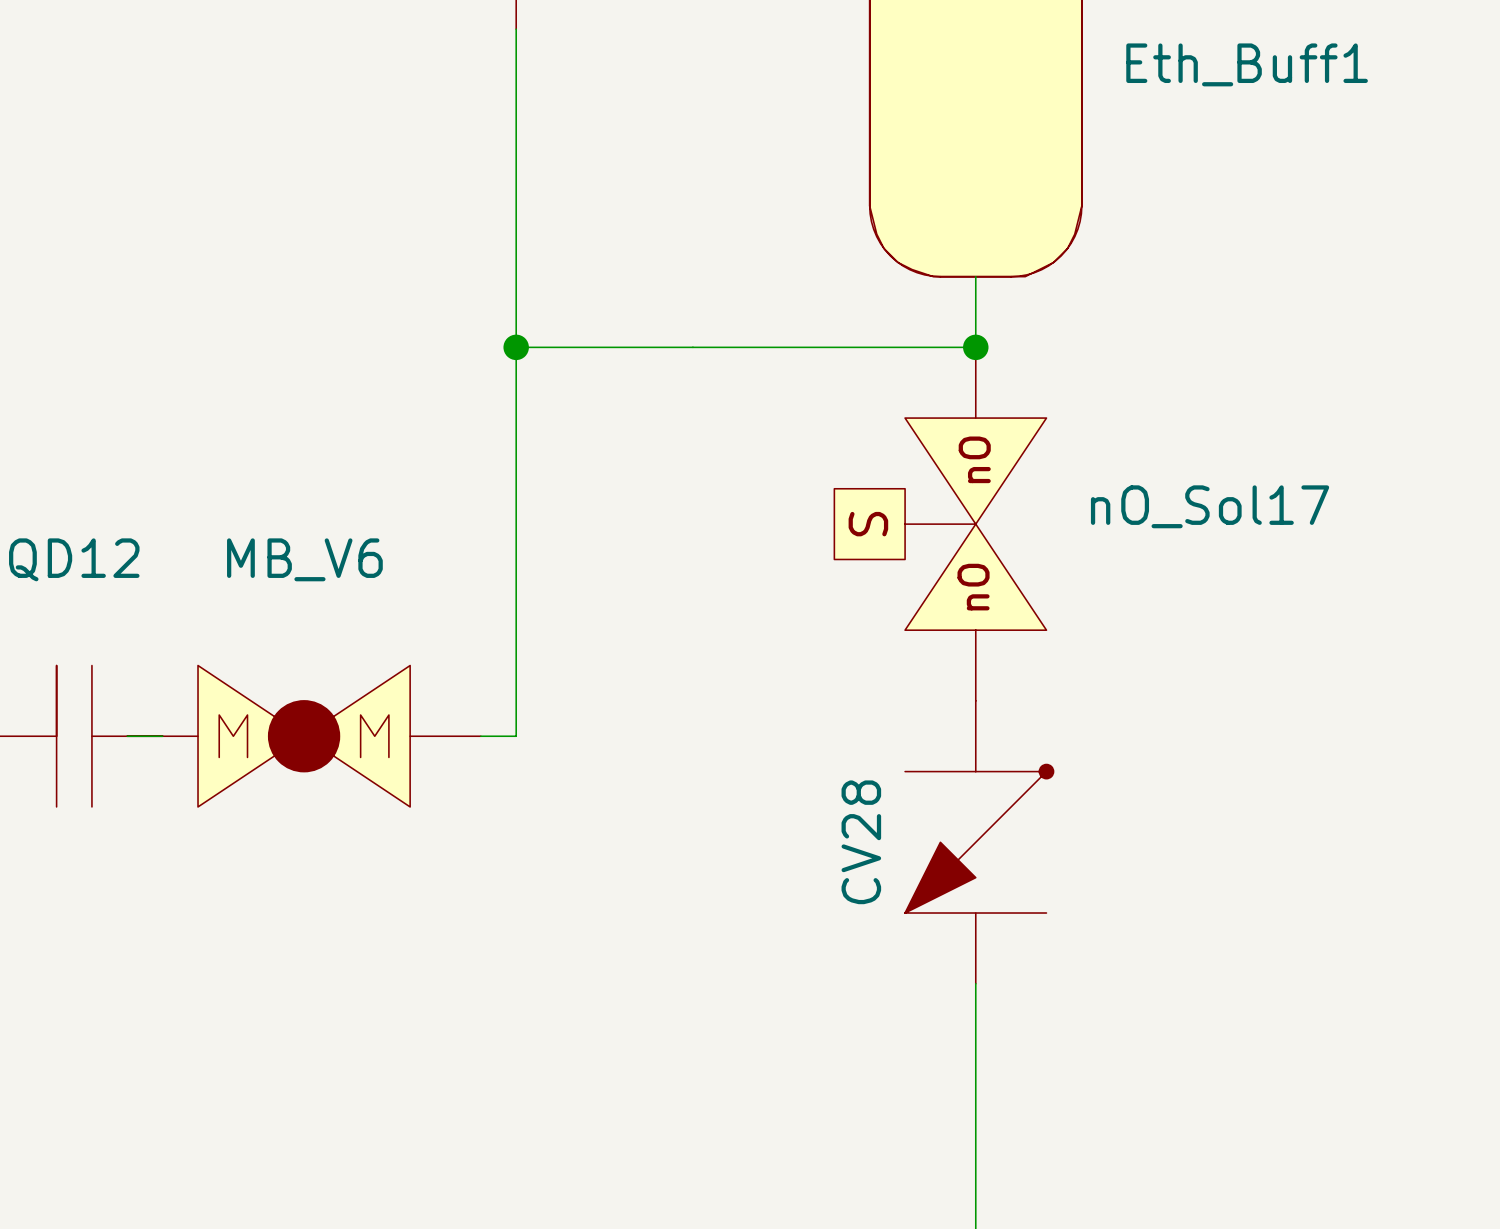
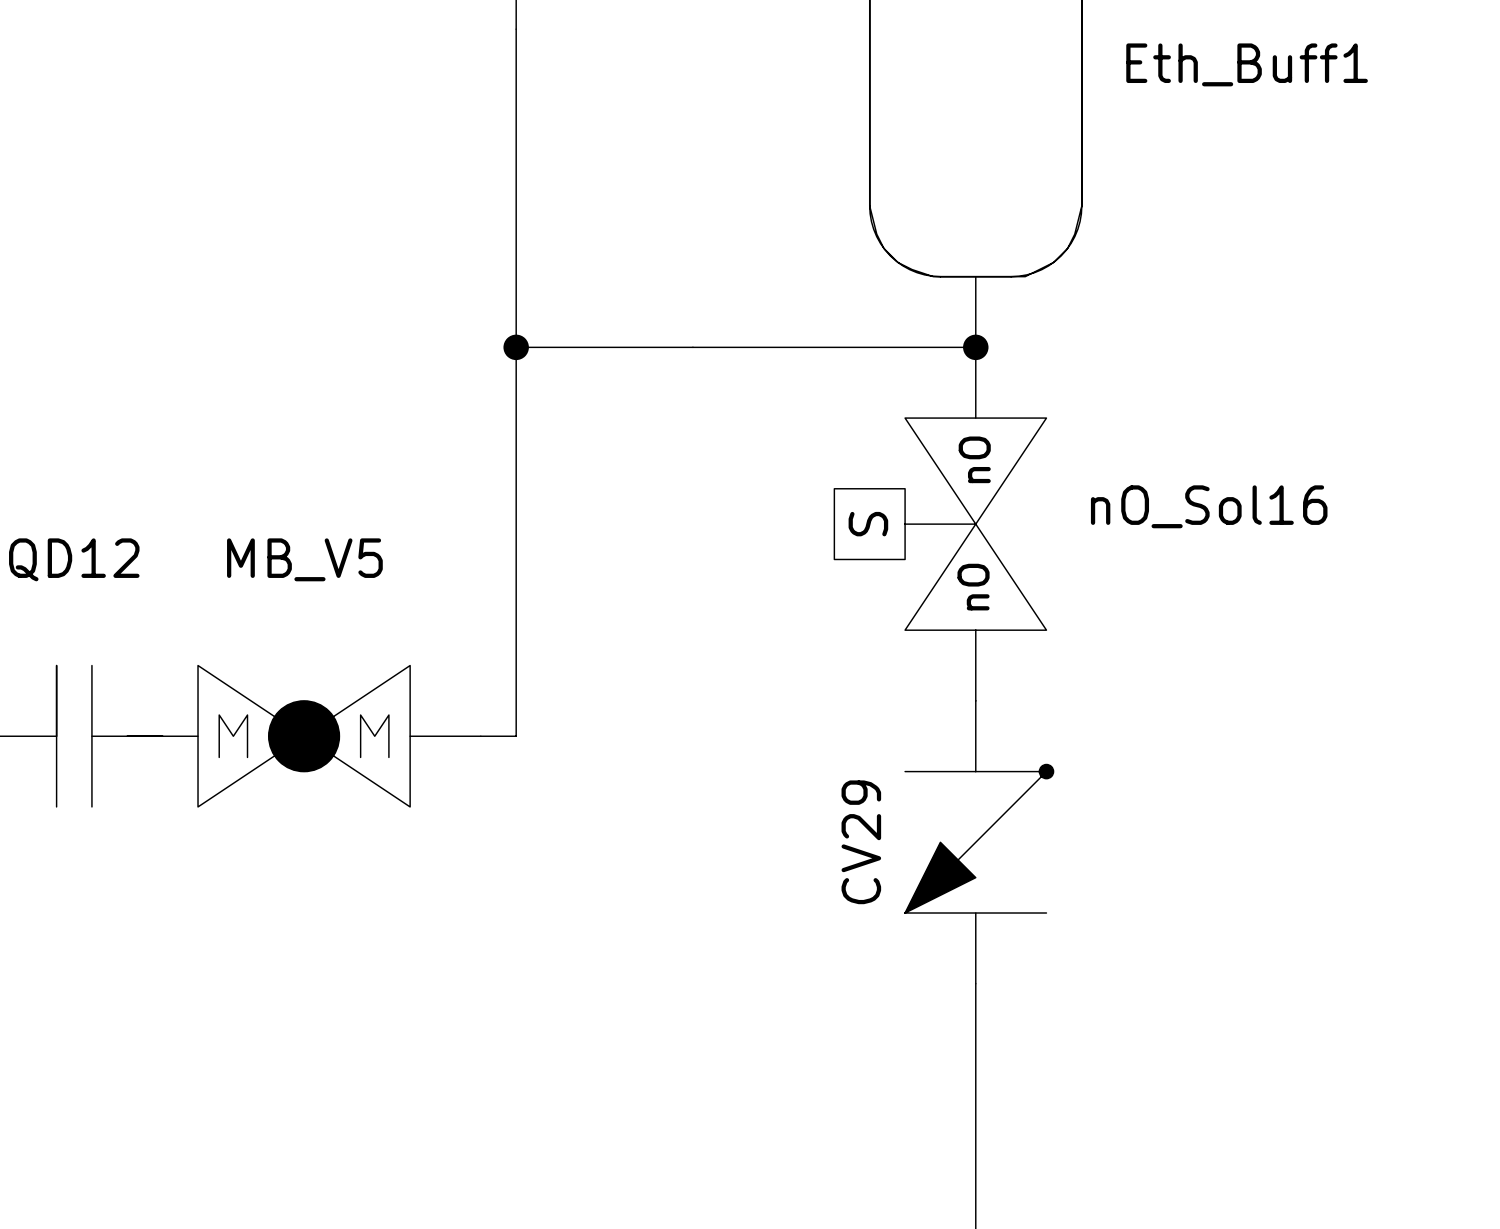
nO_Sol17 name: nO_Sol17 (1210, 506) -> nO_Sol16 (1209, 506)
MB_V6 name: MB_V6 (304, 559) -> MB_V5 (304, 559)
CV28 name: CV28 (861, 842) -> CV29 (861, 842)

